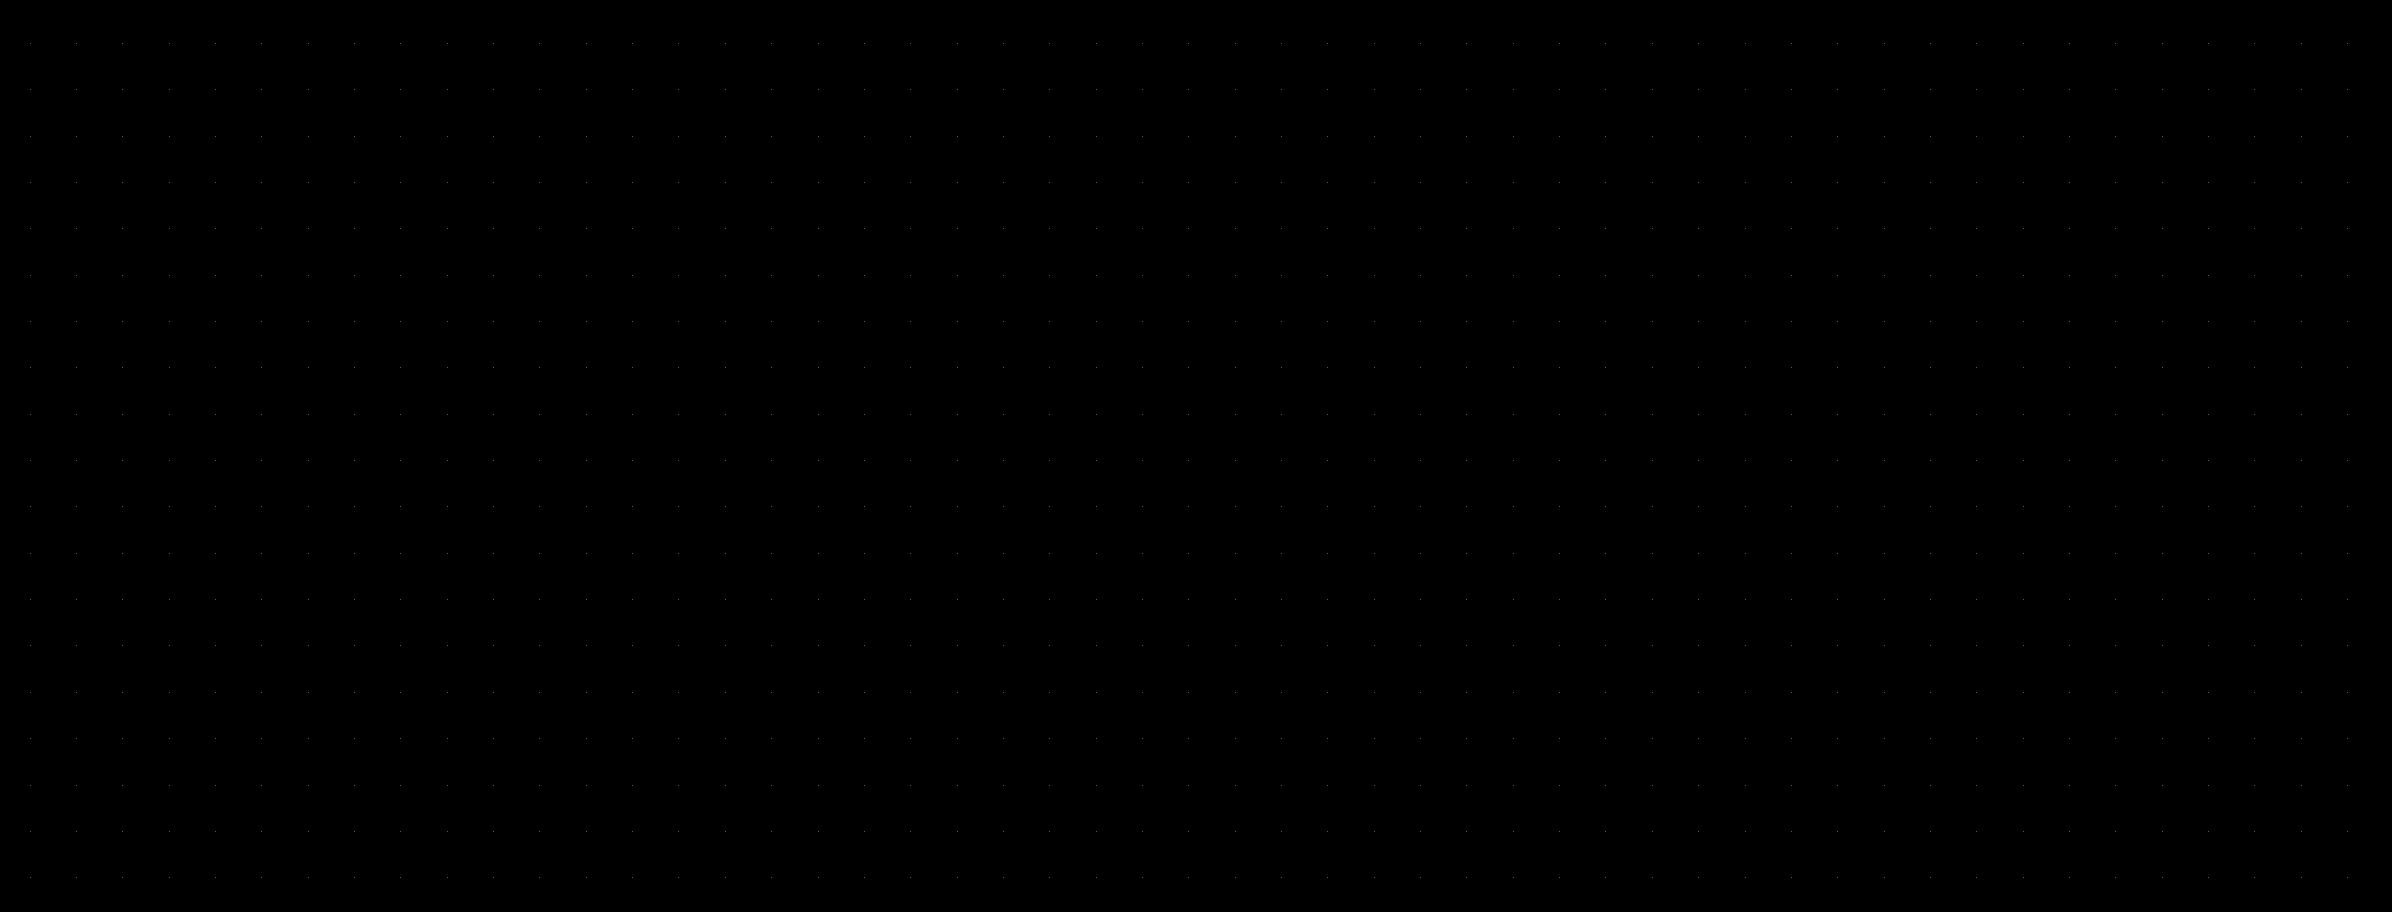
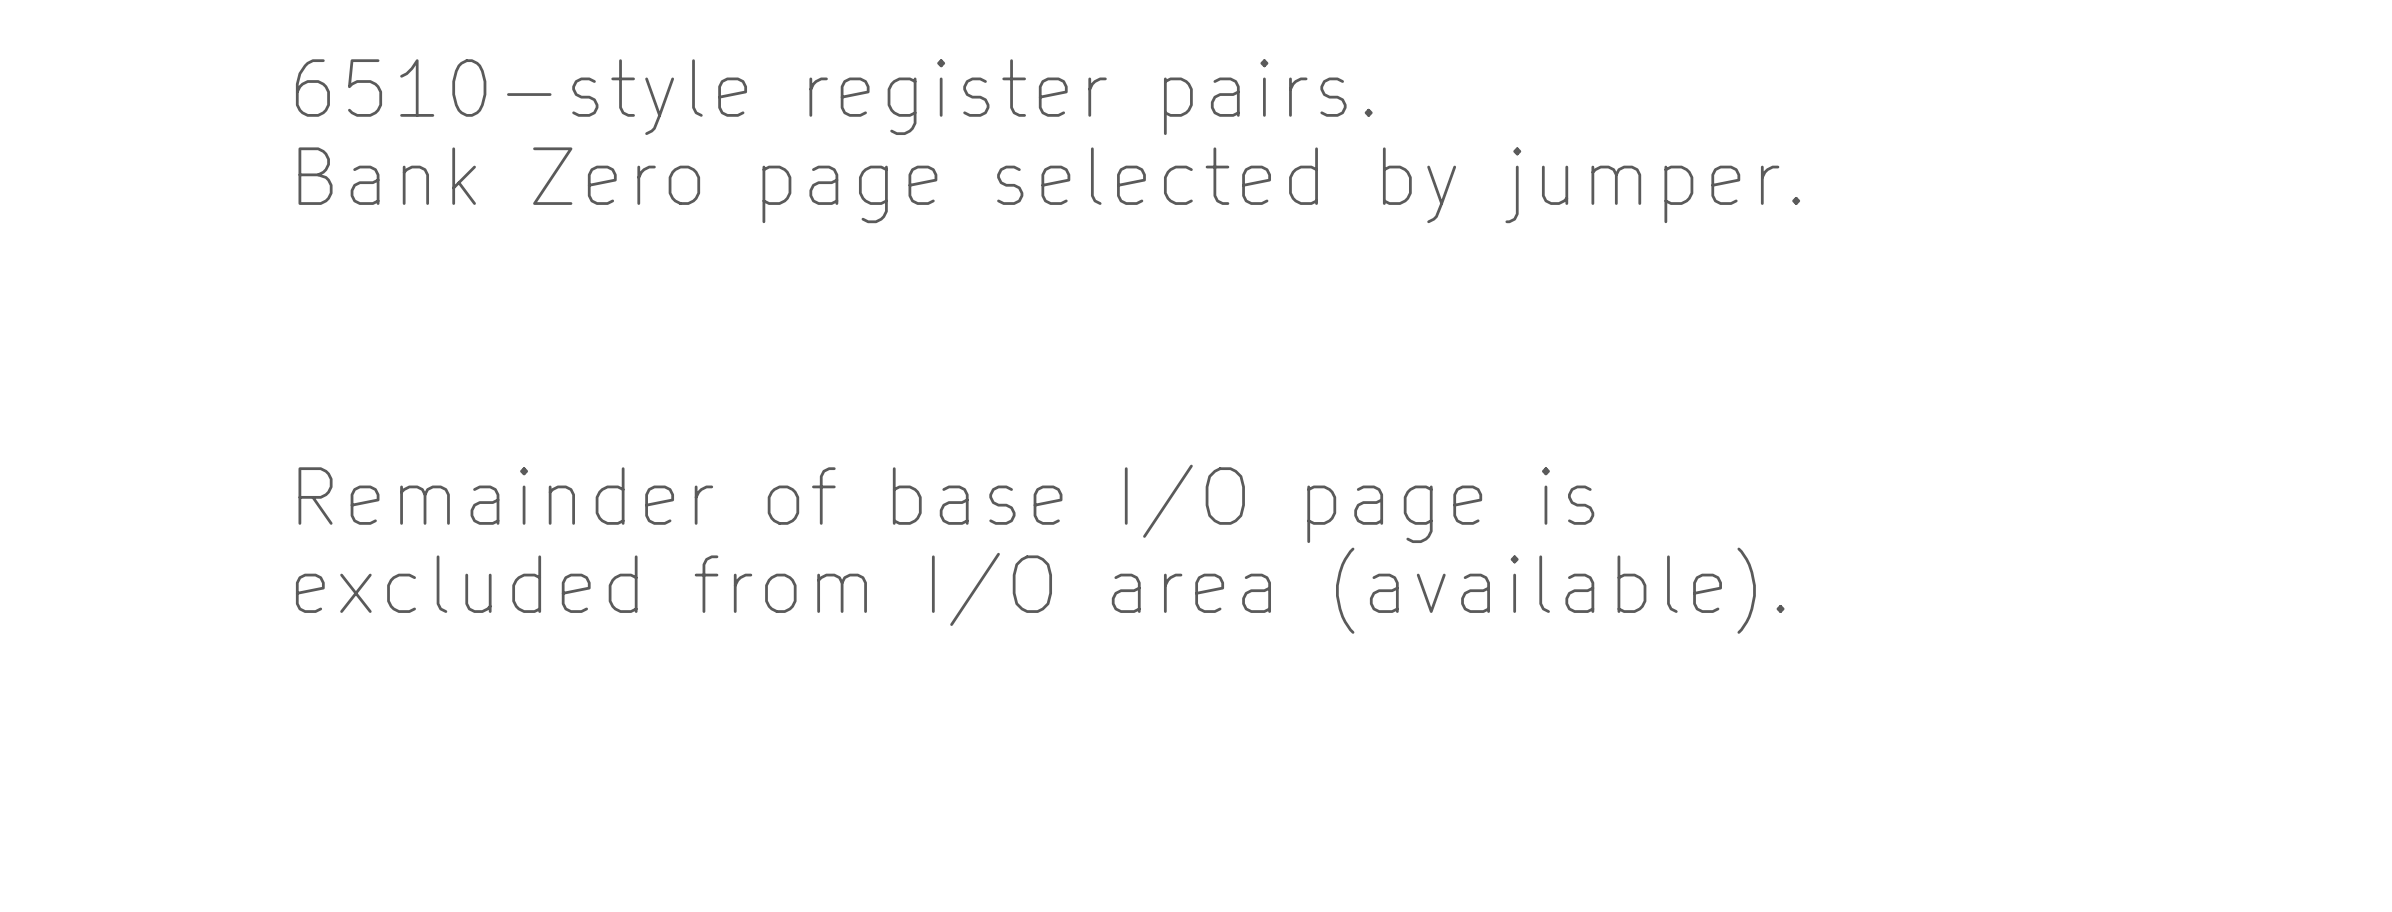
text: none -> 6510-style register pairs. (834, 97)
text: none -> Bank Zero page selected by jumper. (1049, 185)
text: none -> Remainder of base I/O page is (946, 503)
text: none -> excluded from I/O area (available). (1040, 590)

